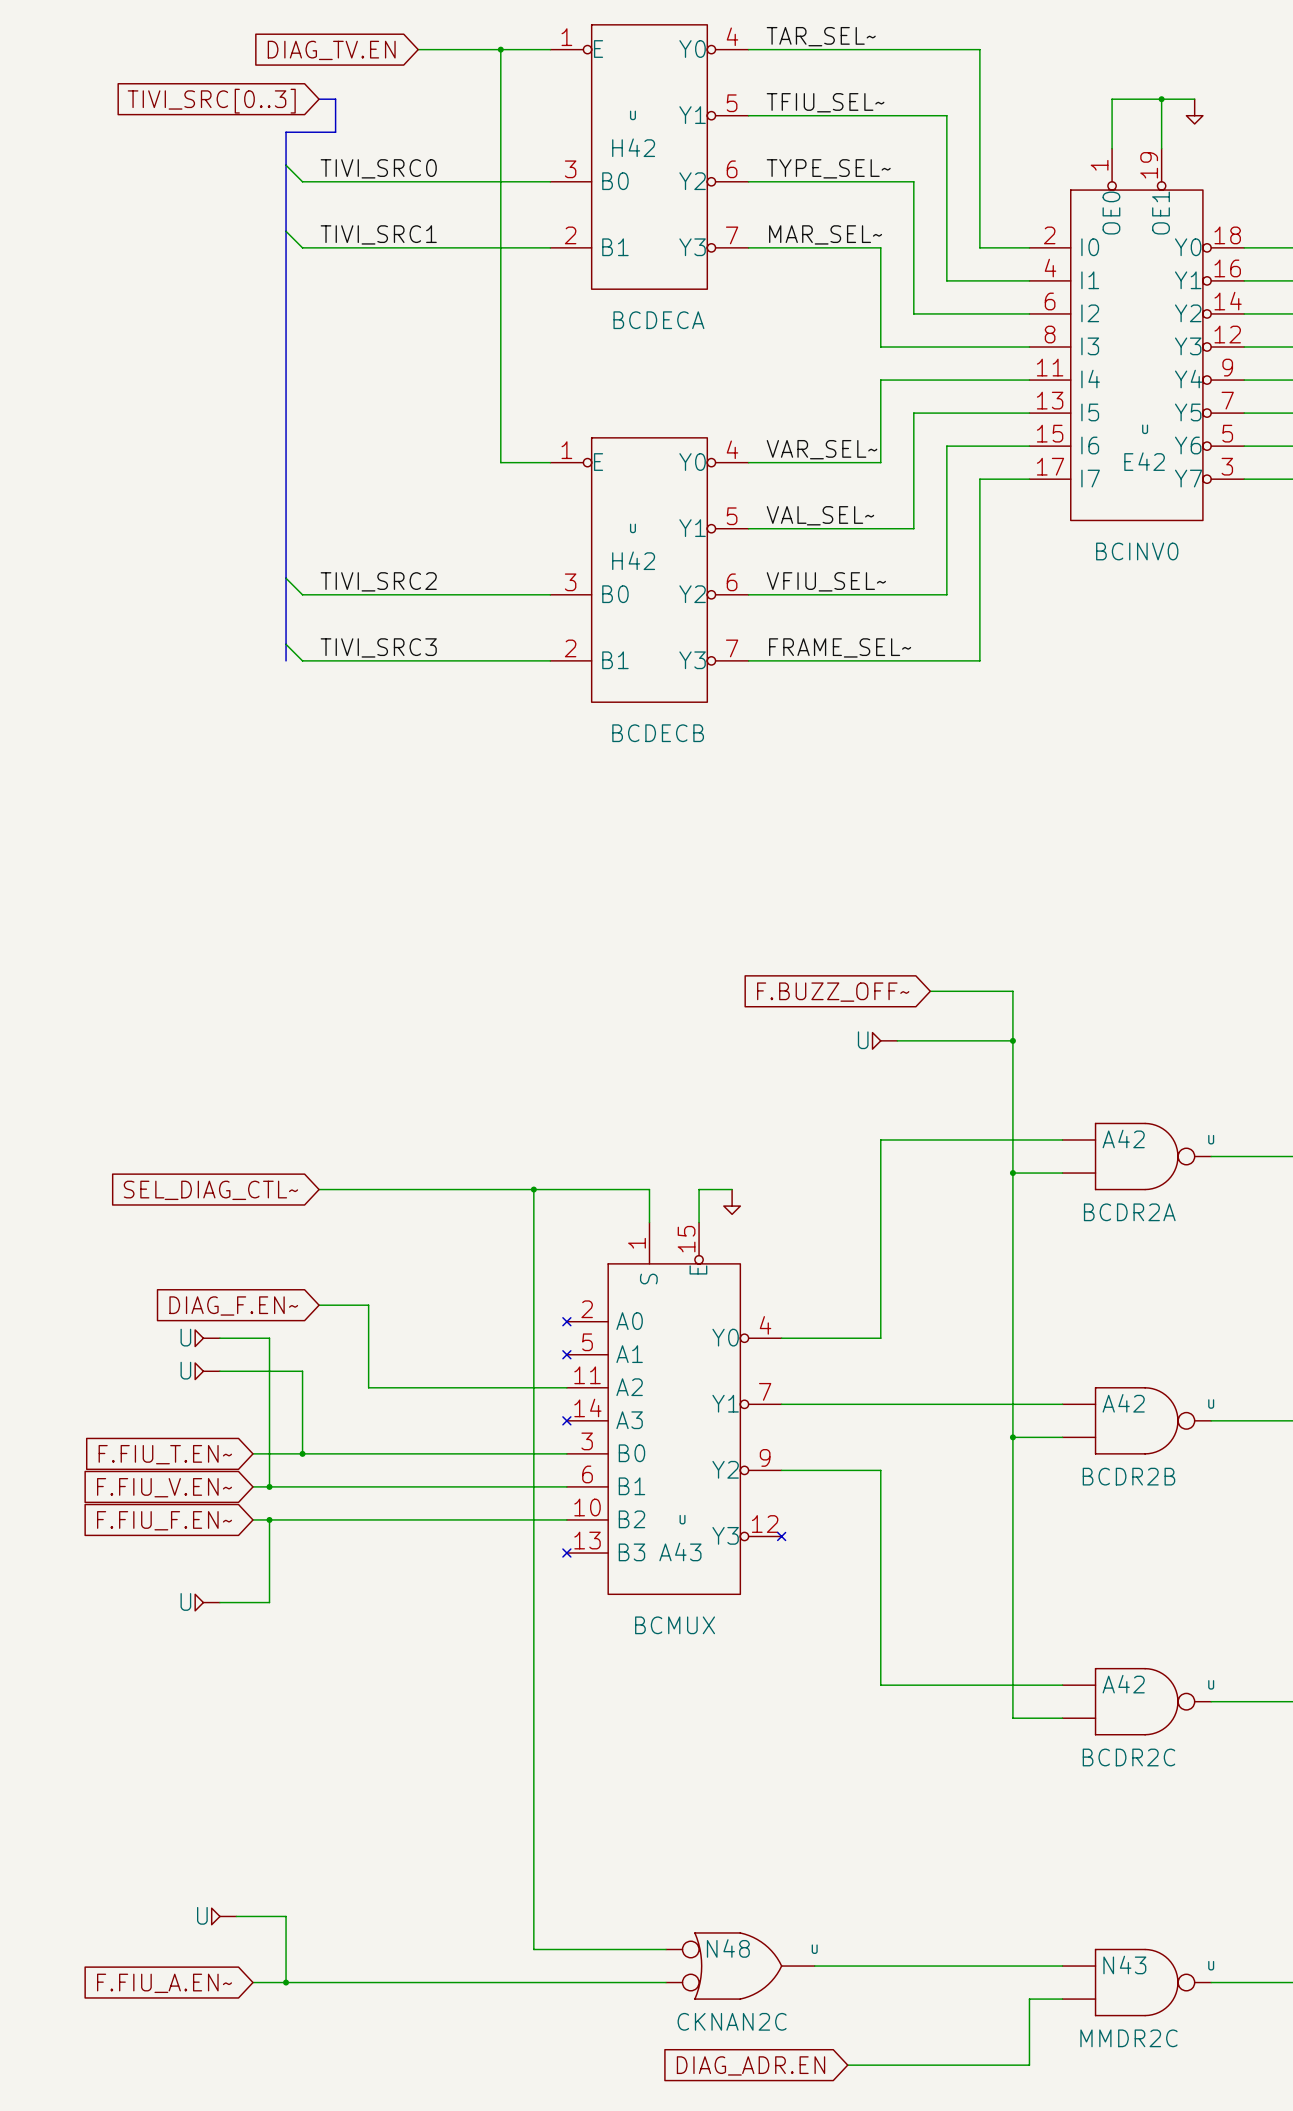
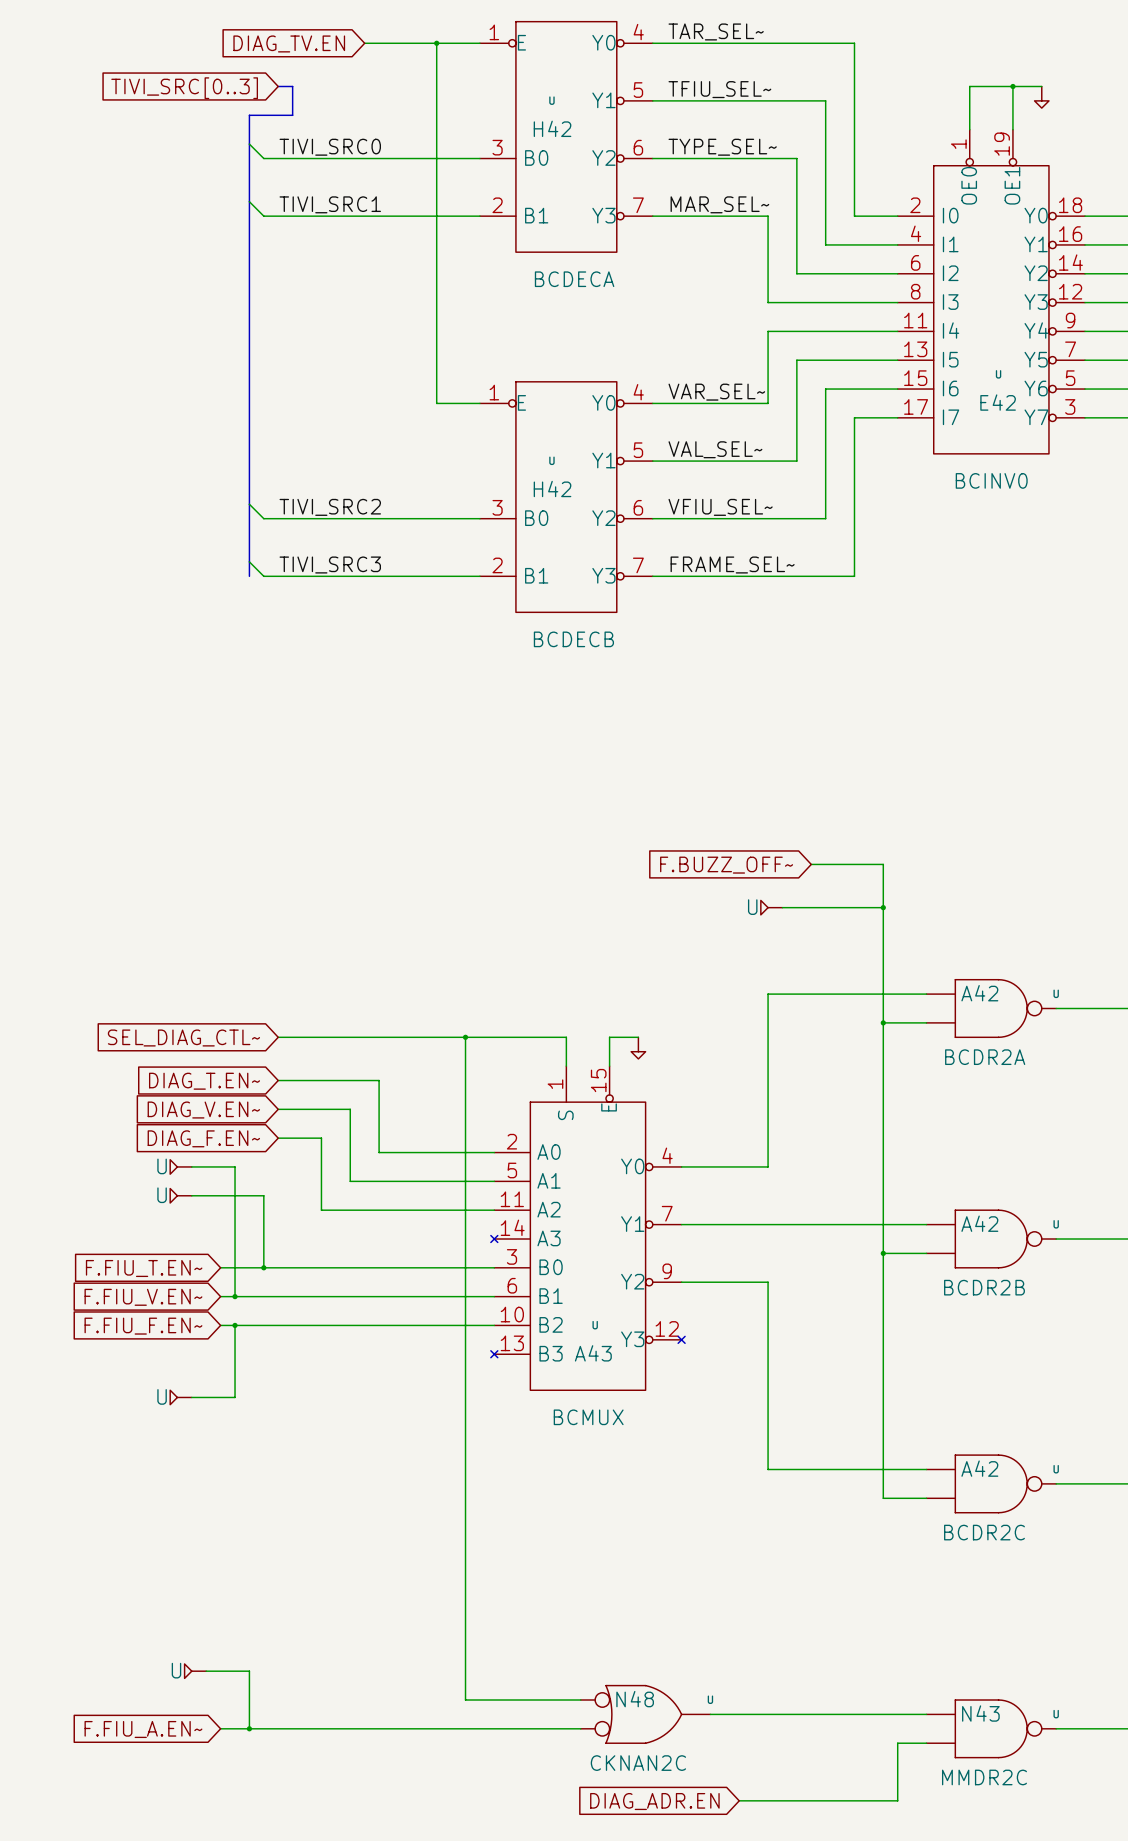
global label: none -> DIAG_T.EN~ (204, 1081)
wire: none -> (278, 1080) (379, 1080) (379, 1152) (494, 1152)
global label: none -> DIAG_V.EN~ (203, 1110)
wire: none -> (278, 1109) (350, 1109) (350, 1181) (494, 1181)
no-connect mark: (566, 1321) -> none
no-connect mark: (566, 1354) -> none

